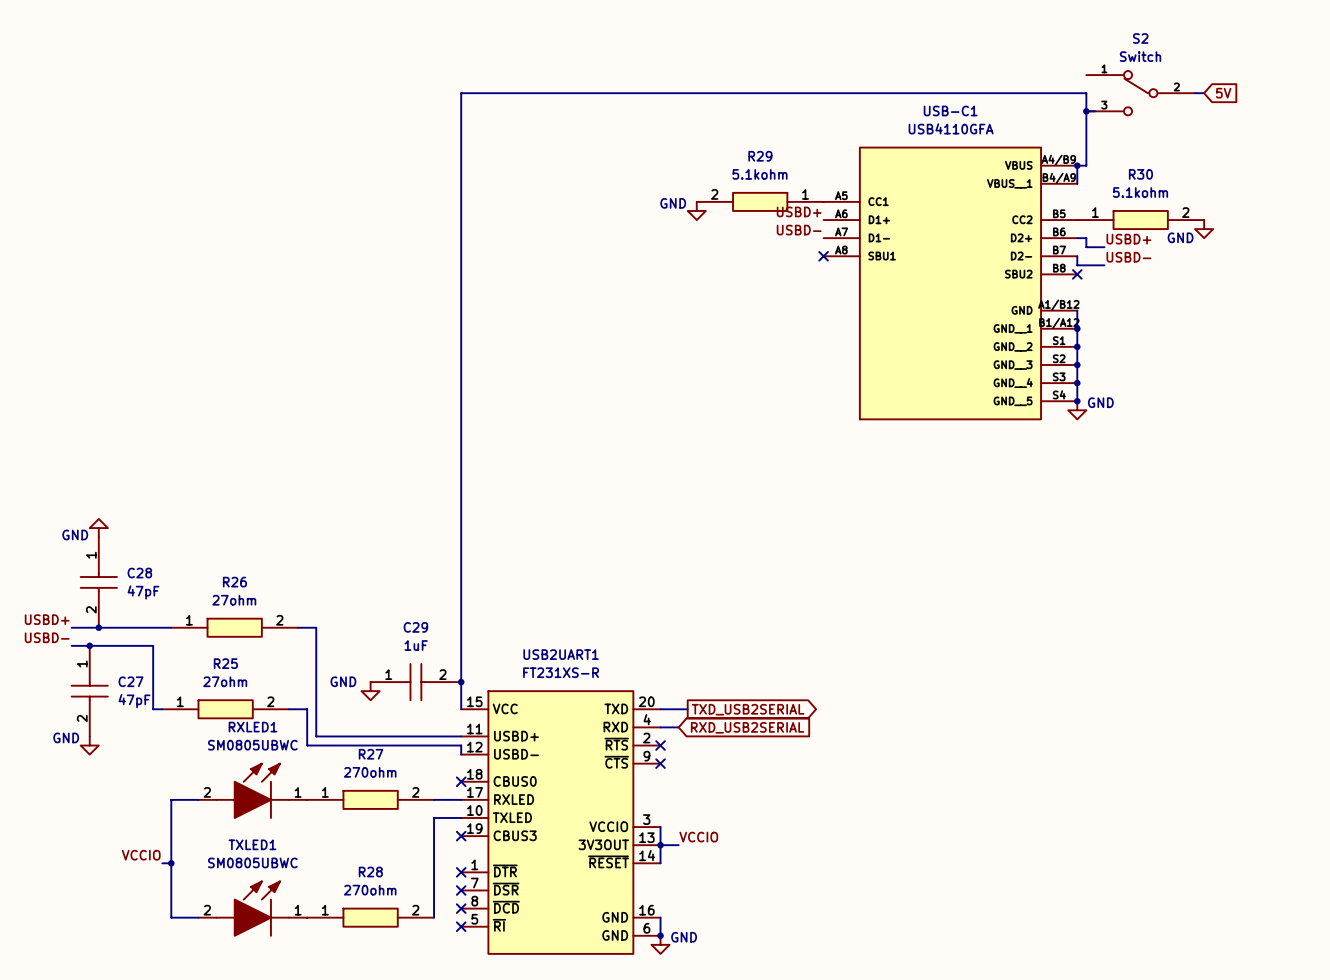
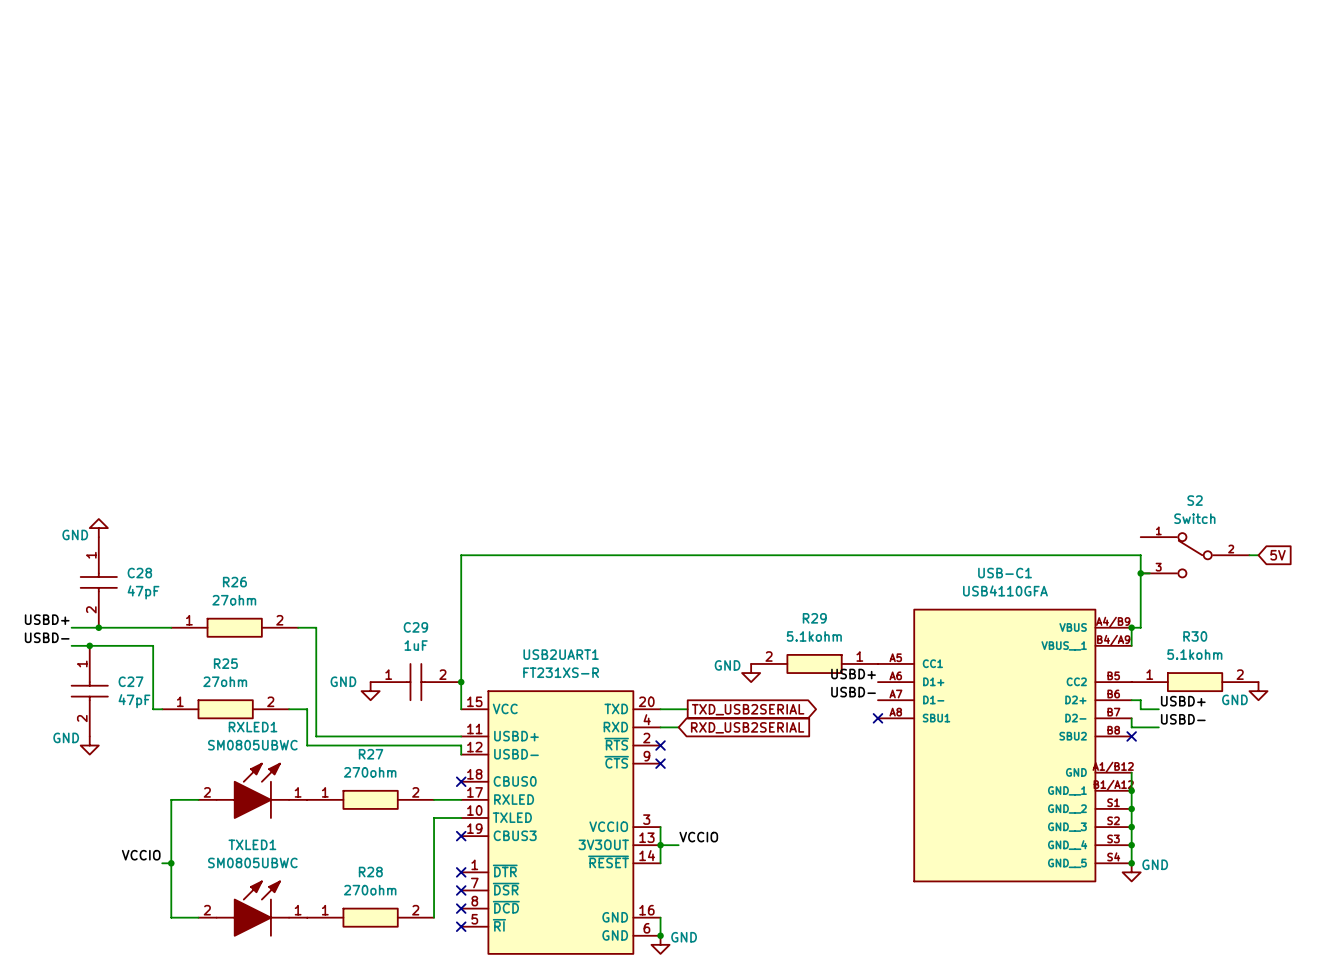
S2 position: (1140, 93) -> (1195, 555)
wire: (1195, 93) (1204, 93) -> none
global label: 5V (1223, 93) -> none
wire: (1086, 111) (1095, 111) -> none
junction: (1086, 111) -> none
junction: (1077, 165) -> none
wire: (1077, 183) (1077, 165) (1086, 165) (1086, 93) (461, 93) (461, 555) -> (1131, 645) (1131, 627) (1140, 627) (1140, 555) (461, 555)
R29 position: (760, 201) -> (814, 663)
power symbol: GND (696, 210) -> none
label: USBD+ (799, 211) -> none
R30 position: (1140, 220) -> (1195, 682)
power symbol: GND (1204, 229) -> none
label: USBD- (799, 230) -> none
wire: (1077, 238) (1086, 238) (1086, 247) (1104, 247) -> none
label: USBD+ (1128, 239) -> none
no-connect mark: (823, 256) -> none
wire: (1077, 256) (1077, 265) (1104, 265) -> none
label: USBD- (1128, 257) -> none
no-connect mark: (1077, 274) -> none
USB-C1 position: (950, 283) -> (1004, 745)
wire: (1077, 310) (1077, 401) -> none
junction: (1077, 328) -> none
junction: (1077, 346) -> none
junction: (1077, 365) -> none
junction: (1077, 383) -> none
junction: (1077, 401) -> none
power symbol: GND (1077, 410) -> none
wire: none -> (1249, 555) (1258, 555)
global label: none -> 5V (1278, 555)
wire: none -> (1140, 573) (1149, 573)
junction: none -> (1140, 573)
junction: none -> (1131, 627)
power symbol: none -> GND (751, 673)
label: none -> USBD+ (853, 674)
power symbol: none -> GND (1258, 691)
label: none -> USBD- (853, 692)
wire: none -> (1131, 700) (1140, 700) (1140, 709) (1158, 709)
label: none -> USBD+ (1183, 701)
no-connect mark: none -> (877, 718)
wire: none -> (1131, 718) (1131, 727) (1158, 727)
label: none -> USBD- (1183, 719)
no-connect mark: none -> (1131, 736)
wire: none -> (1131, 772) (1131, 863)
junction: none -> (1131, 790)
junction: none -> (1131, 808)
junction: none -> (1131, 827)
junction: none -> (1131, 845)
junction: none -> (1131, 863)
power symbol: none -> GND (1131, 872)

